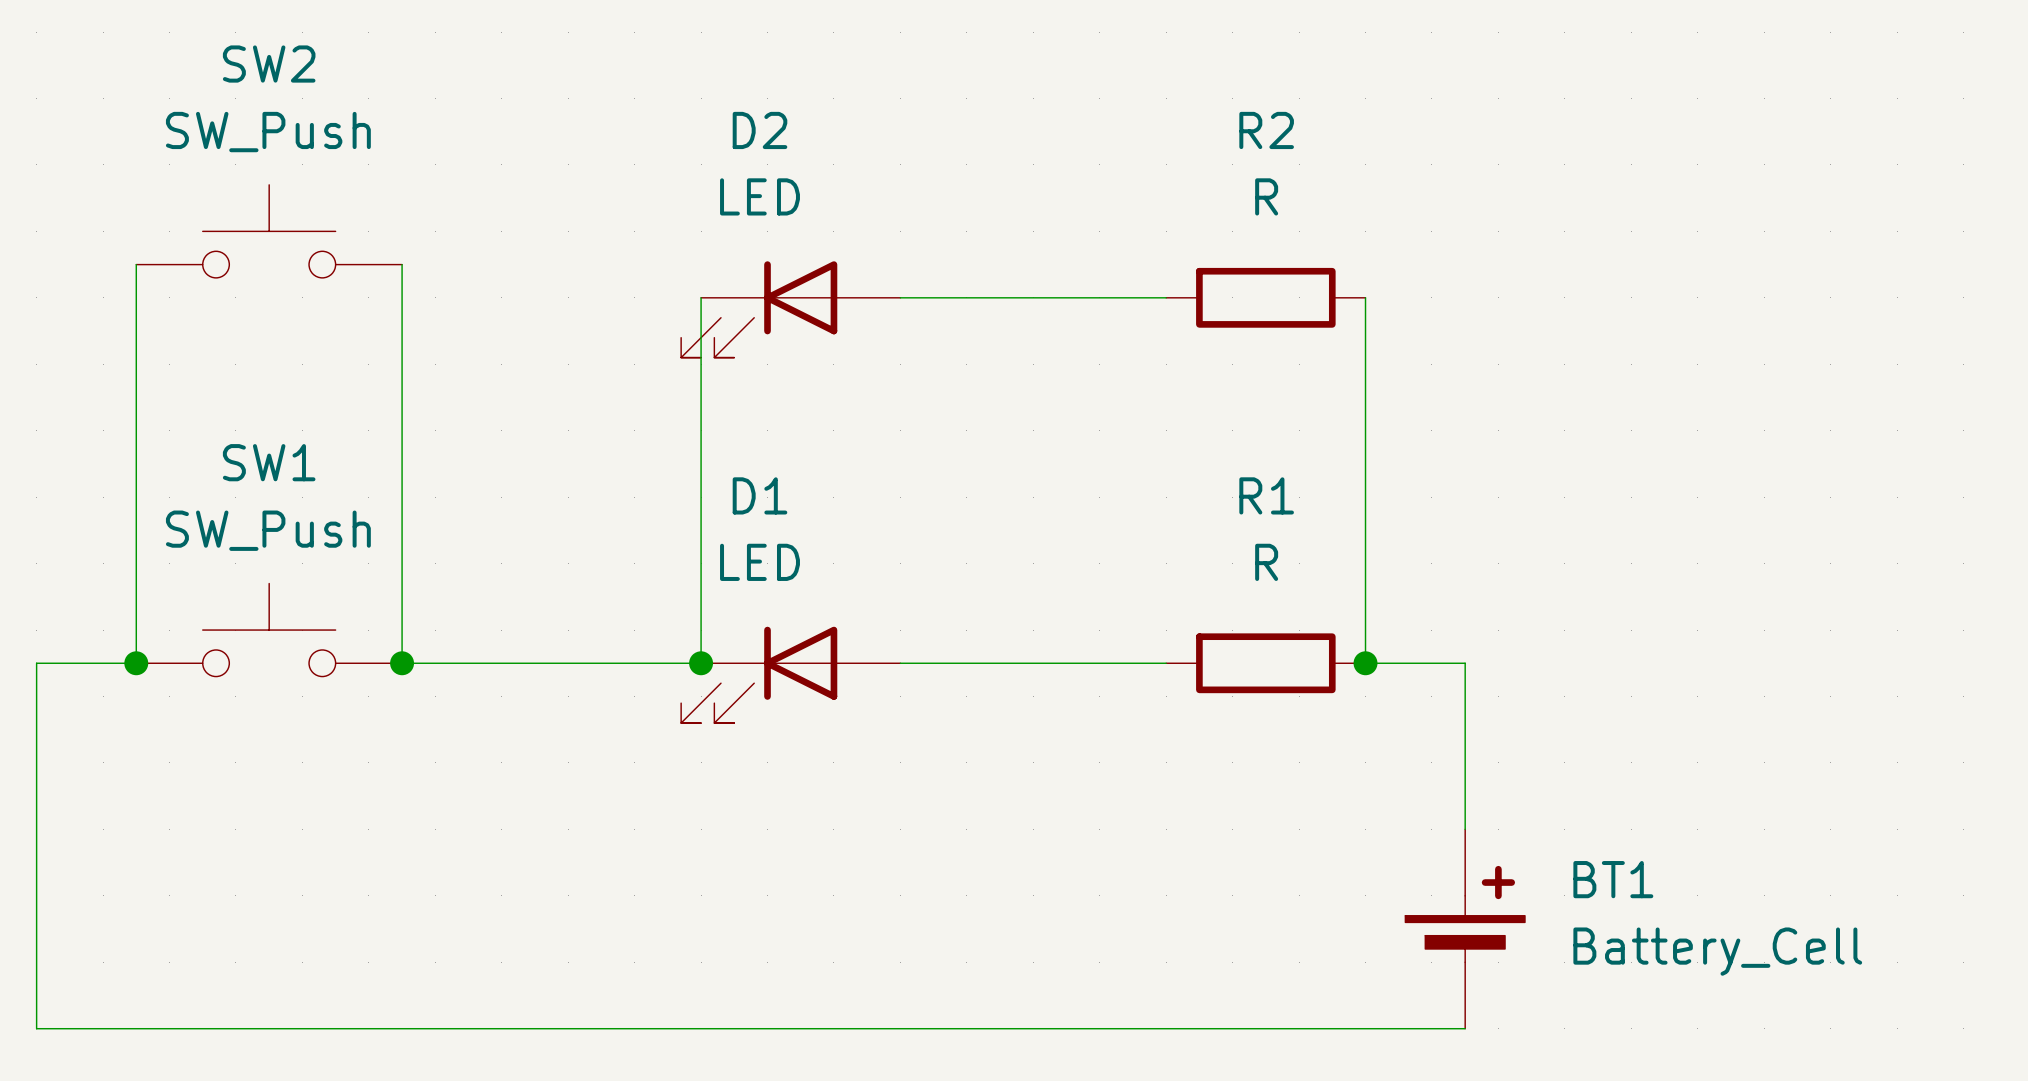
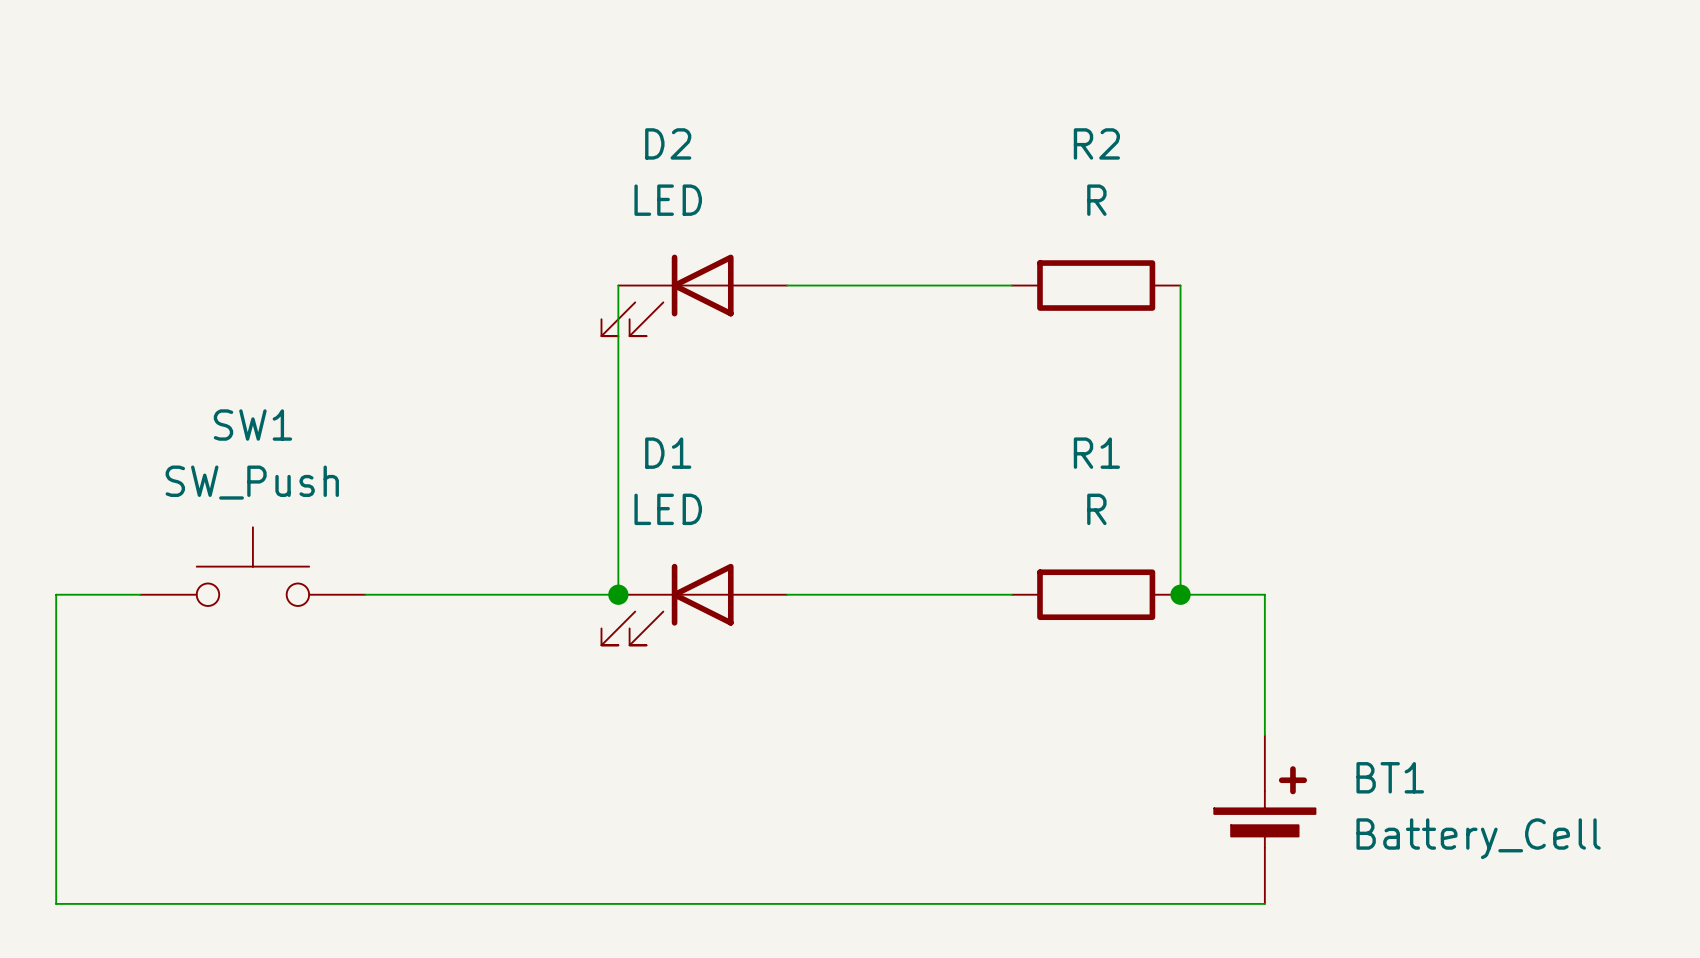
SW2: SW_Push (269, 231) -> none
wire: (136, 264) (136, 663) -> none
wire: (402, 264) (402, 663) -> none
junction: (136, 663) -> none
junction: (402, 663) -> none

